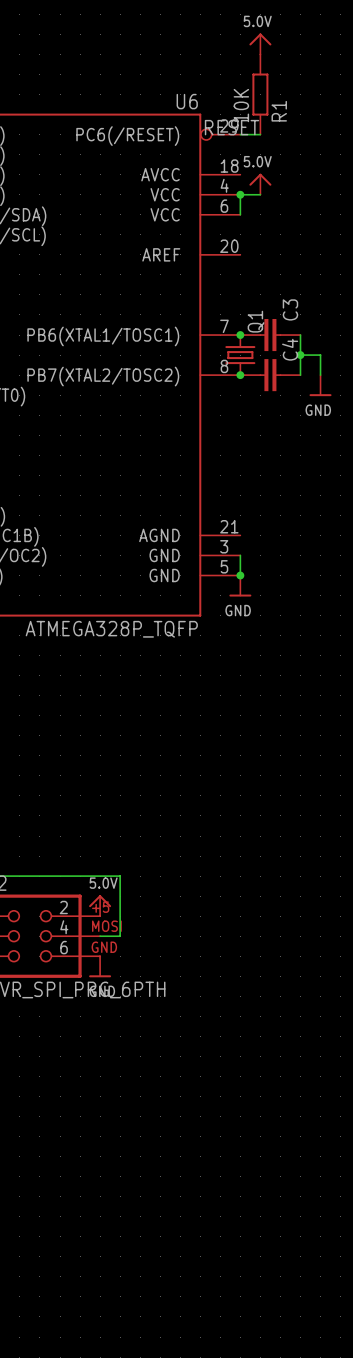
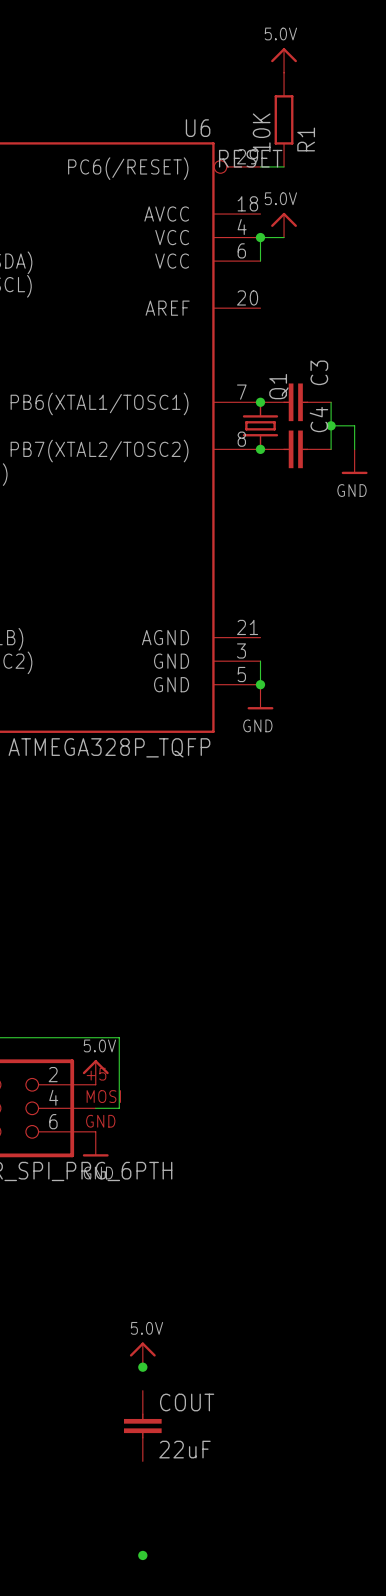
power symbol: none -> 5.0V (142, 1354)
junction: none -> (142, 1367)
COUT: none -> 22uF (142, 1426)
junction: none -> (142, 1555)

